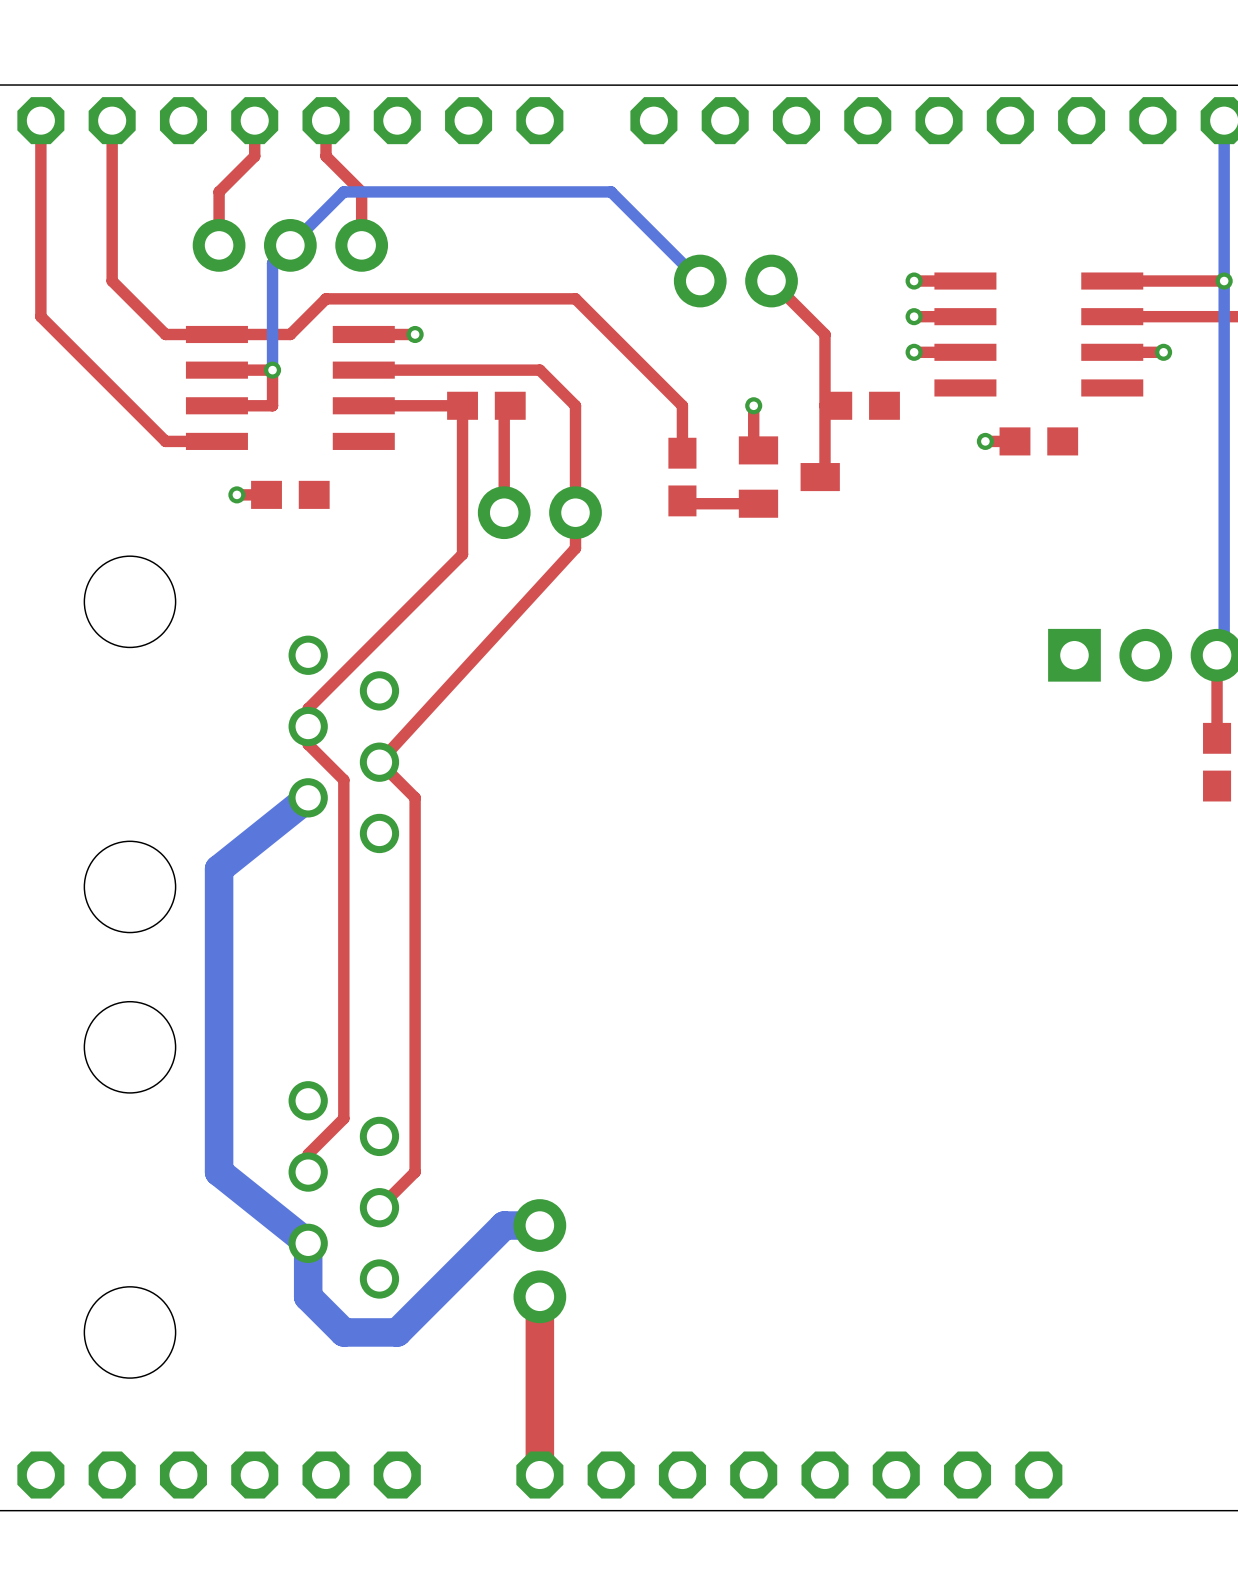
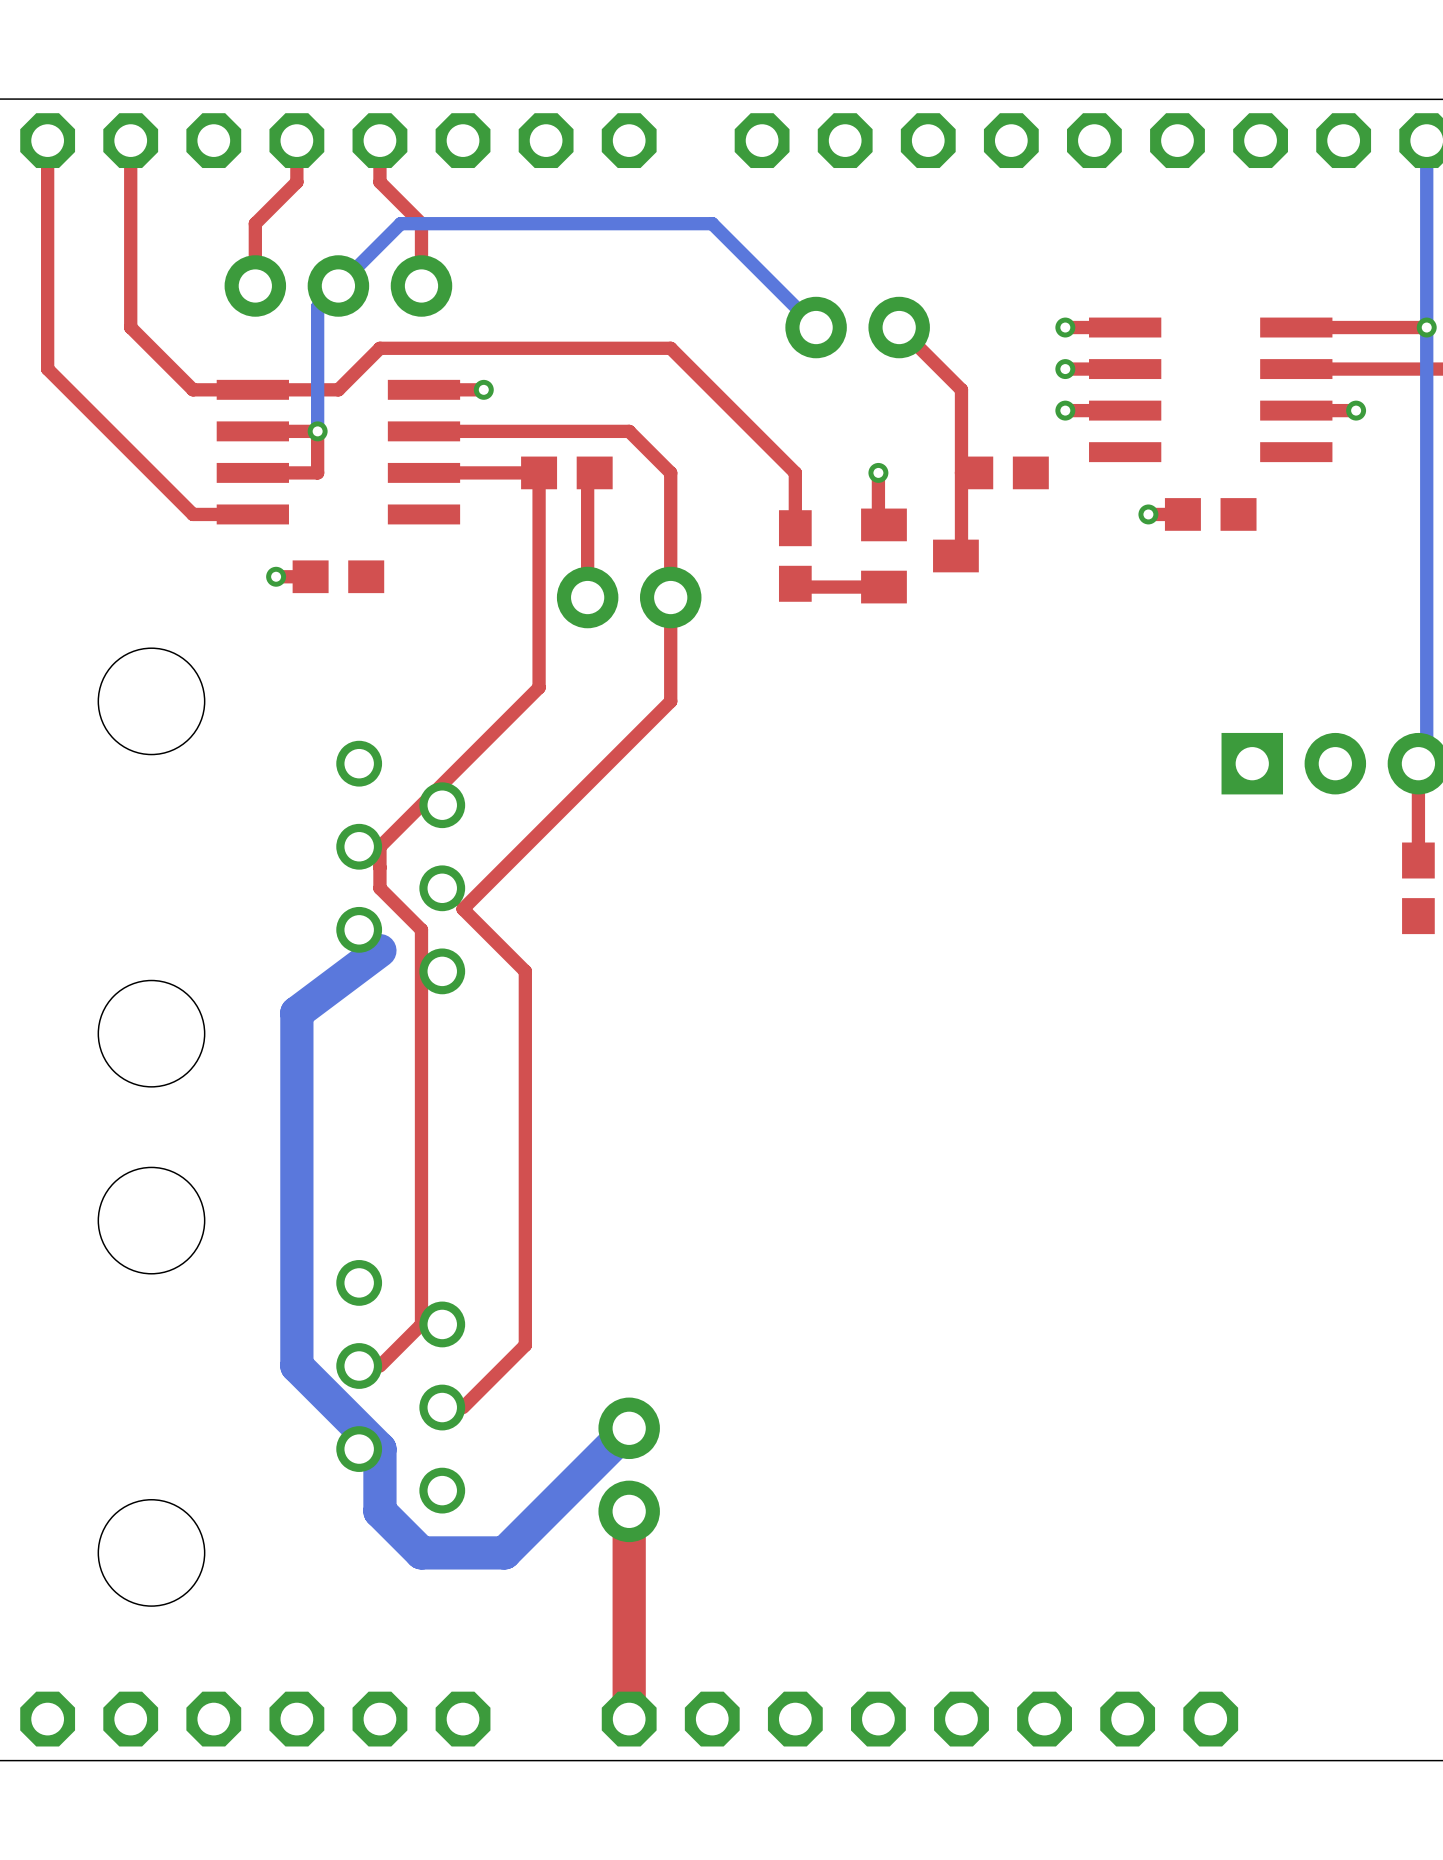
top track: (575, 548) (379, 762) (397, 780) -> (670, 639) (670, 701) (463, 909)
top track: (462, 554) (308, 708) (308, 744) (326, 762) -> (539, 646) (539, 687) (379, 846) (379, 888)
top track: (343, 780) (343, 1118) (308, 1154) (308, 1172) -> (400, 909) (421, 929) (421, 1324) (379, 1365)
bottom track: (308, 797) (219, 869) (219, 1172) (308, 1243) (308, 1296) (343, 1332) (361, 1332) -> (379, 950) (296, 1012) (296, 1365) (379, 1449) (379, 1511) (421, 1552)
top track: (415, 797) (415, 1172) (379, 1207) -> (483, 929) (525, 971) (525, 1345) (463, 1407)
bottom track: (539, 1225) (504, 1225) (397, 1332) -> (629, 1428) (504, 1552) (463, 1552)

